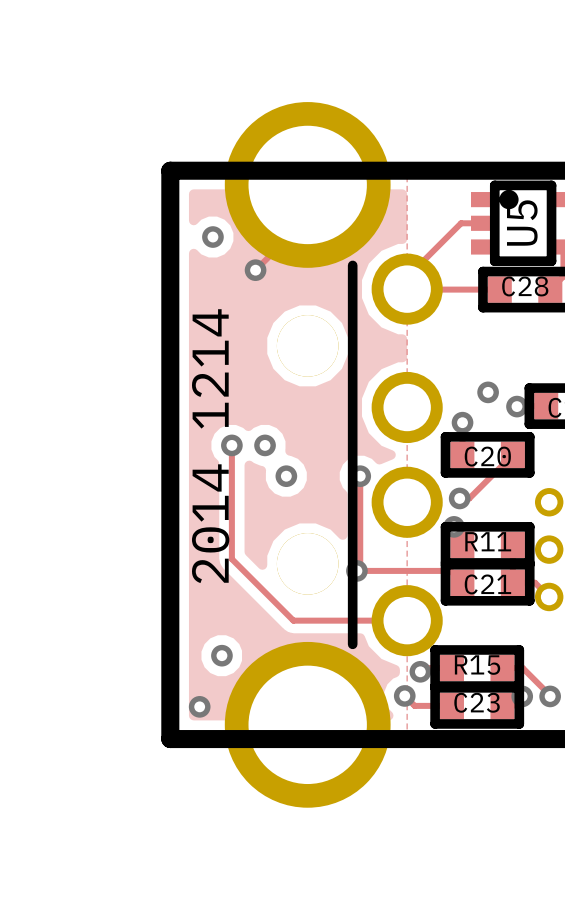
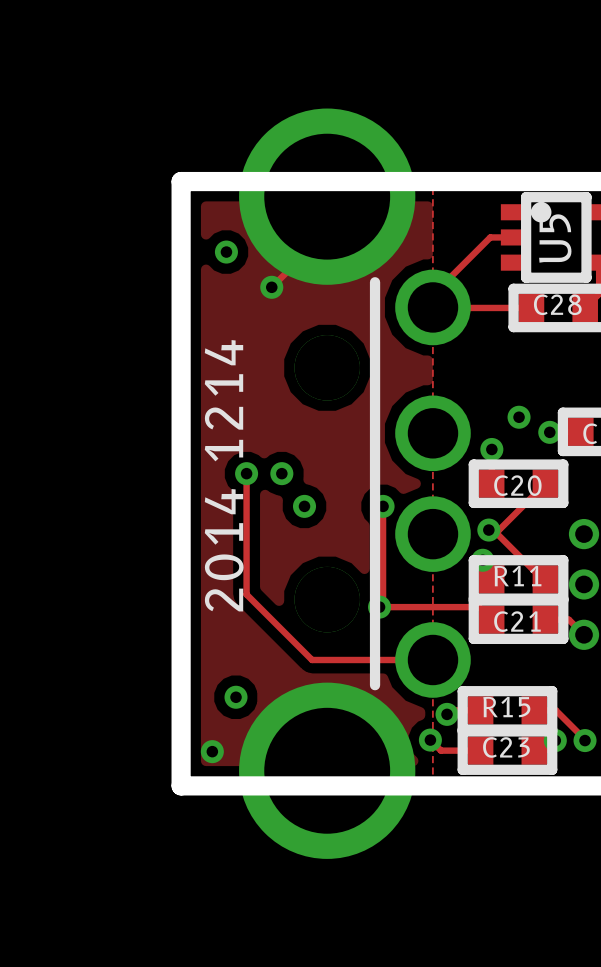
track: none -> (493, 530) (542, 579)

